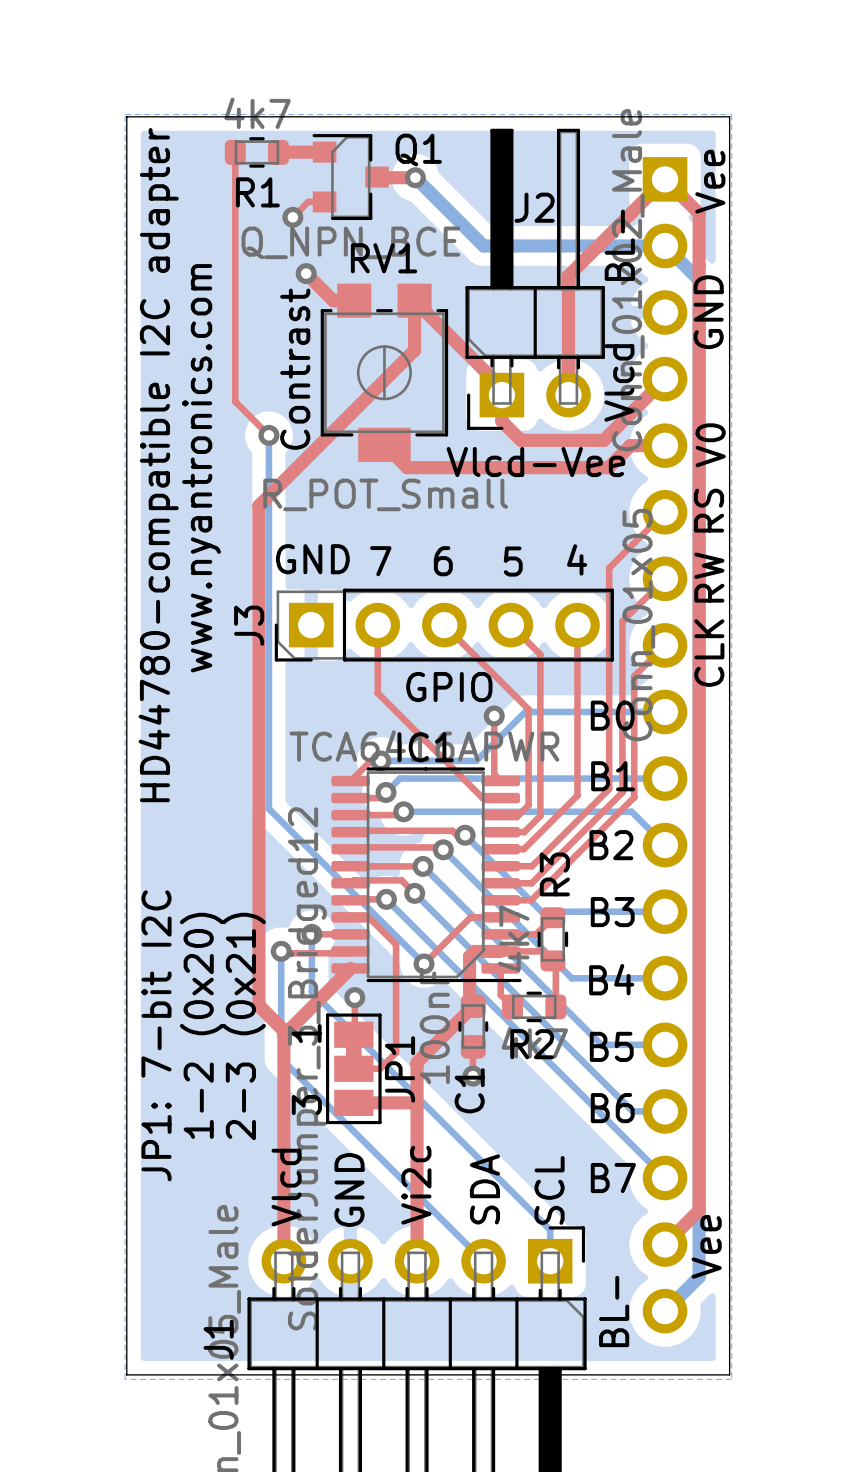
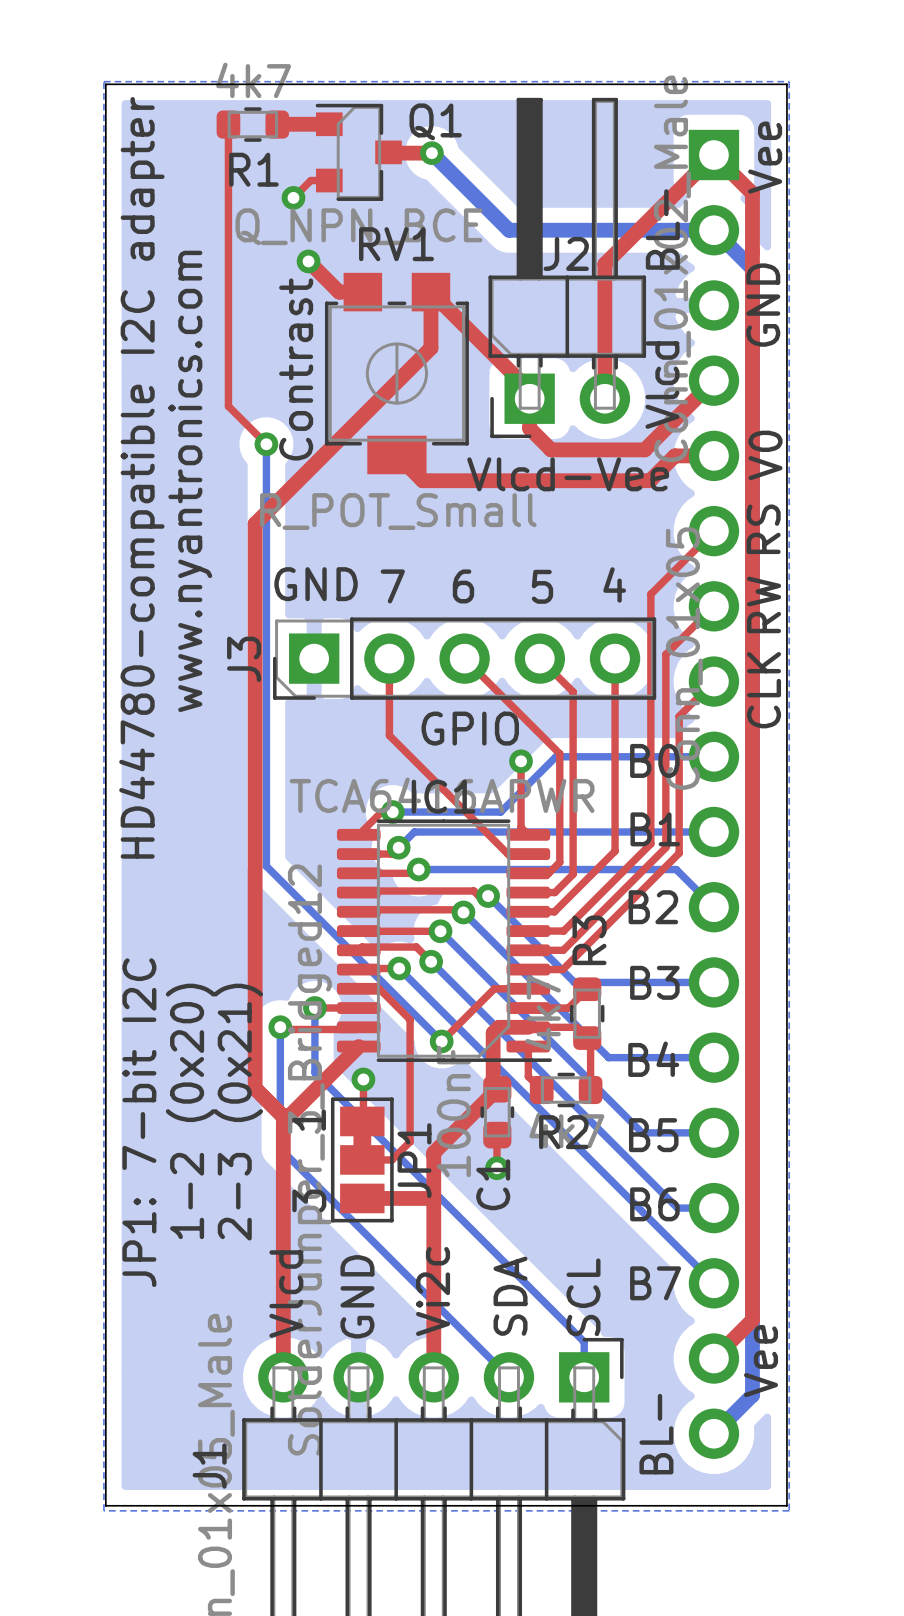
J2 name position: J2 (534, 207) -> J2 (566, 253)

